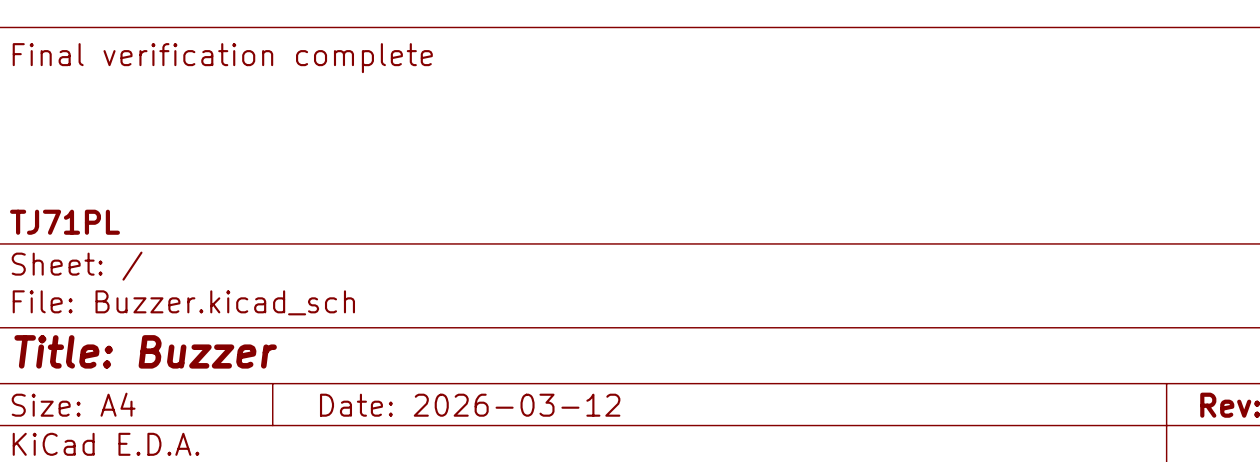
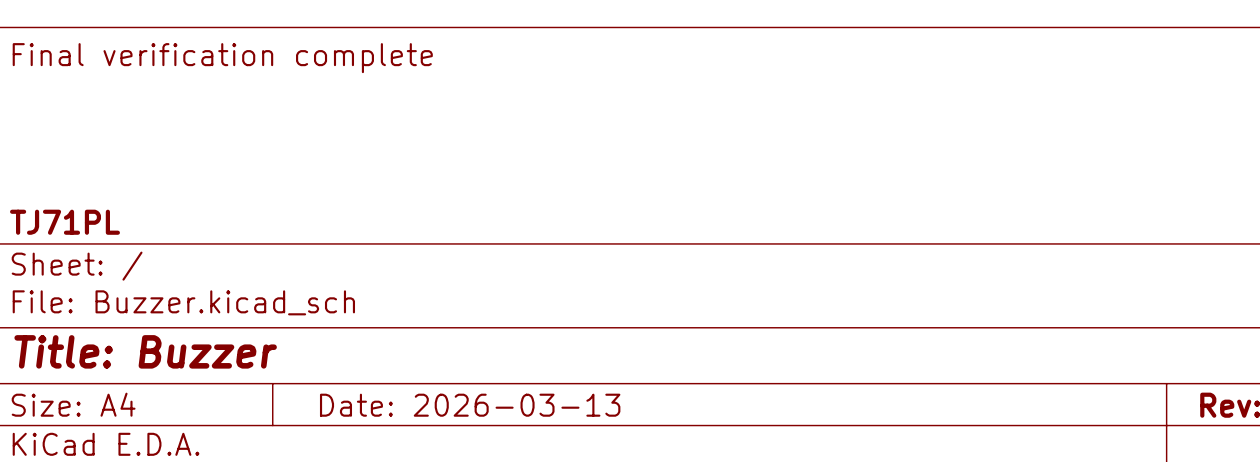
title block: Date: 2026-03-12 (470, 405) -> Date: 2026-03-13 (470, 405)

